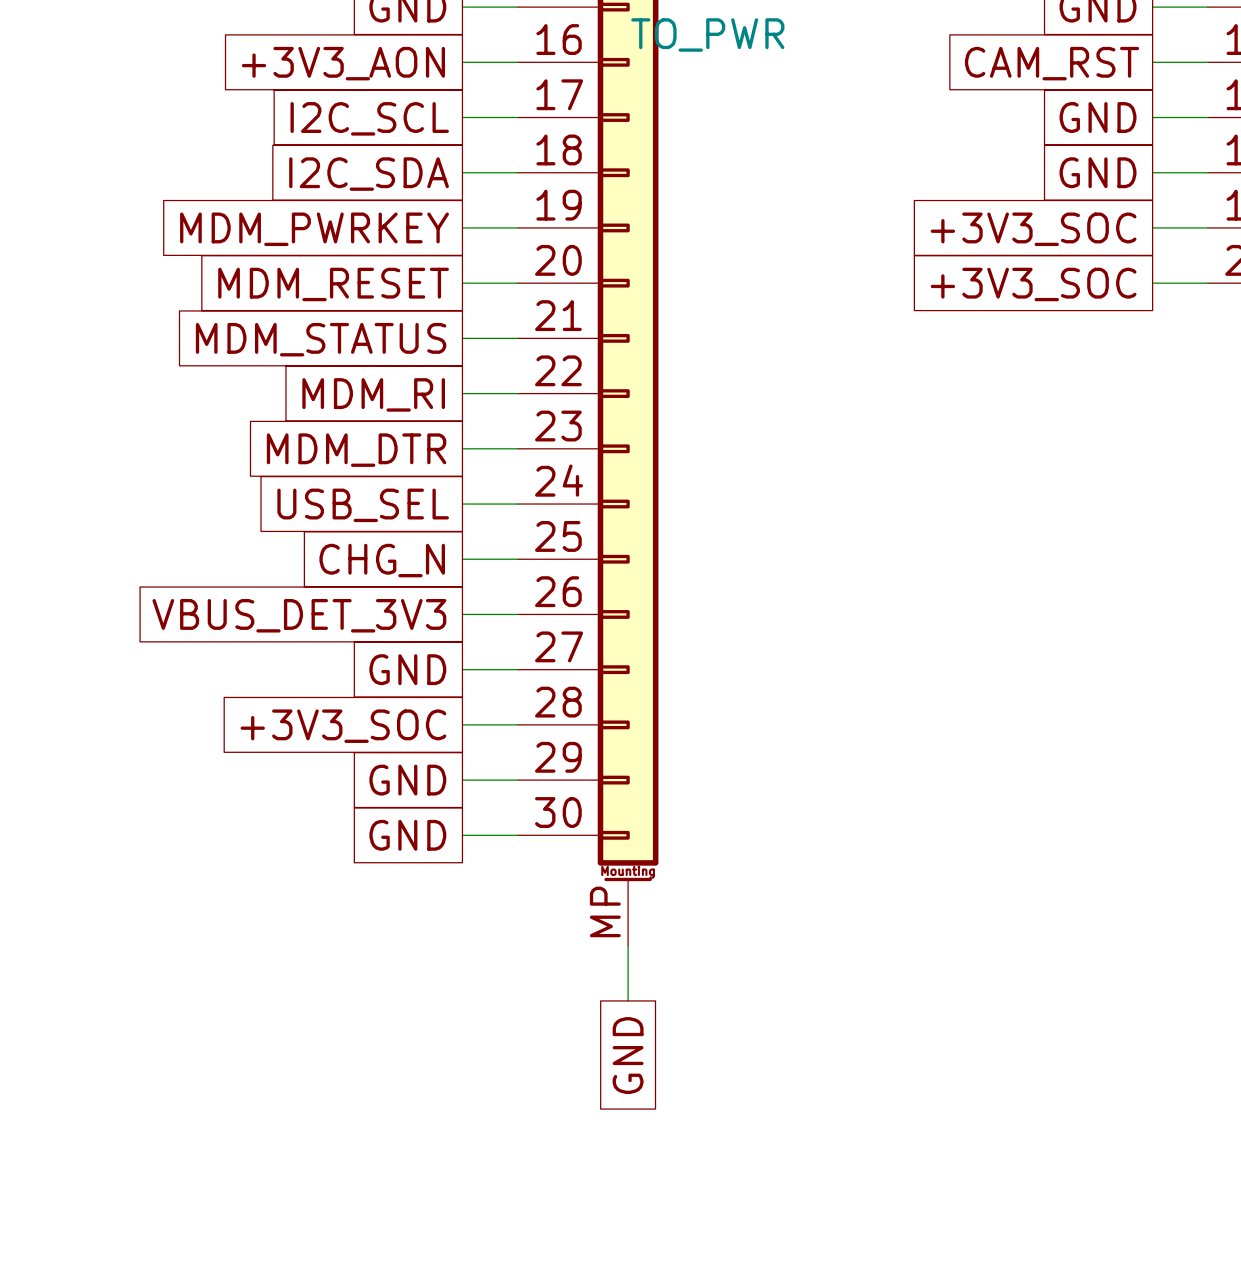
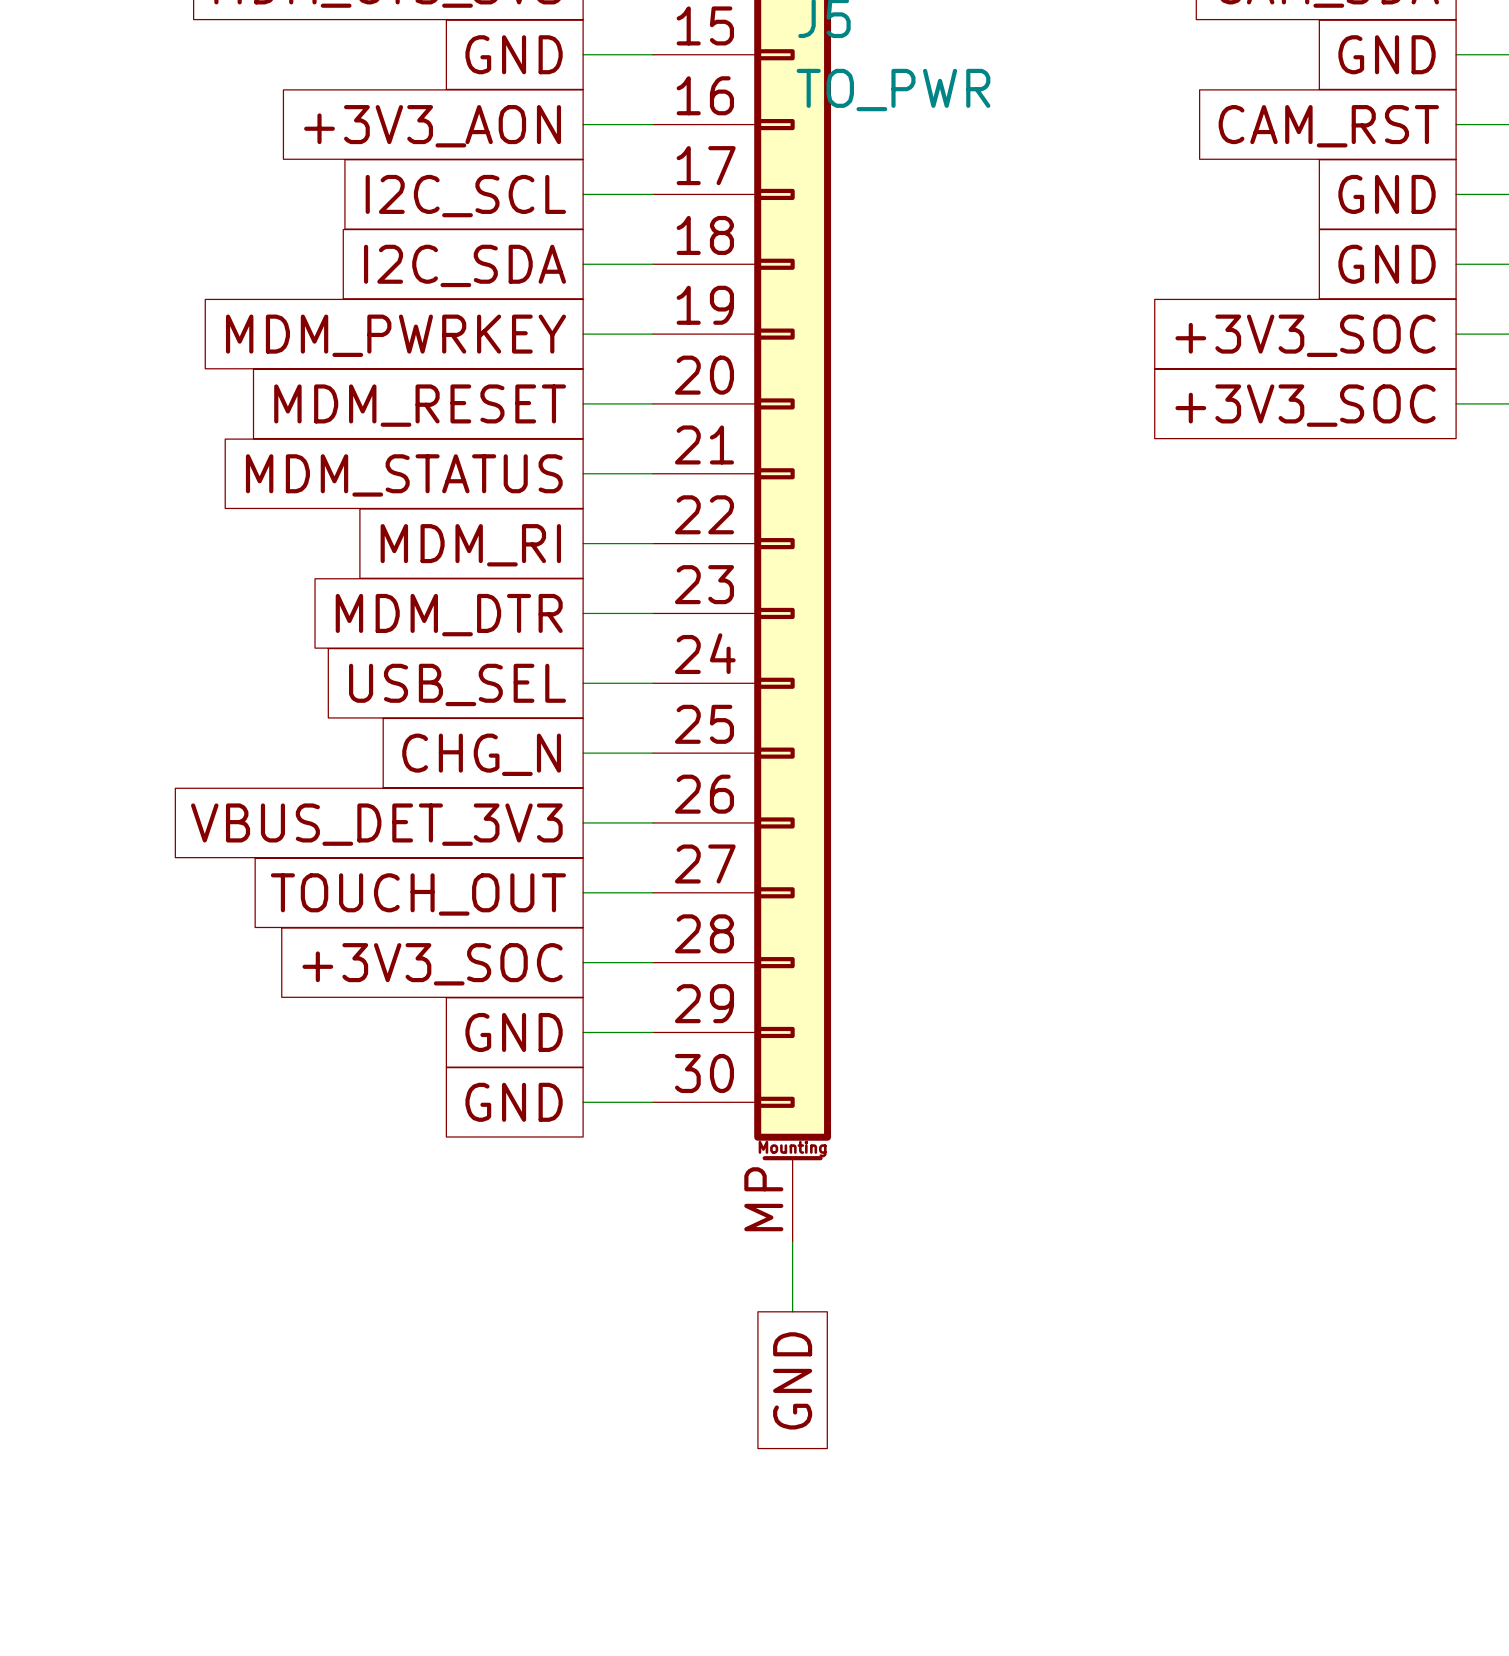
global label: GND (407, 669) -> TOUCH_OUT (418, 894)

